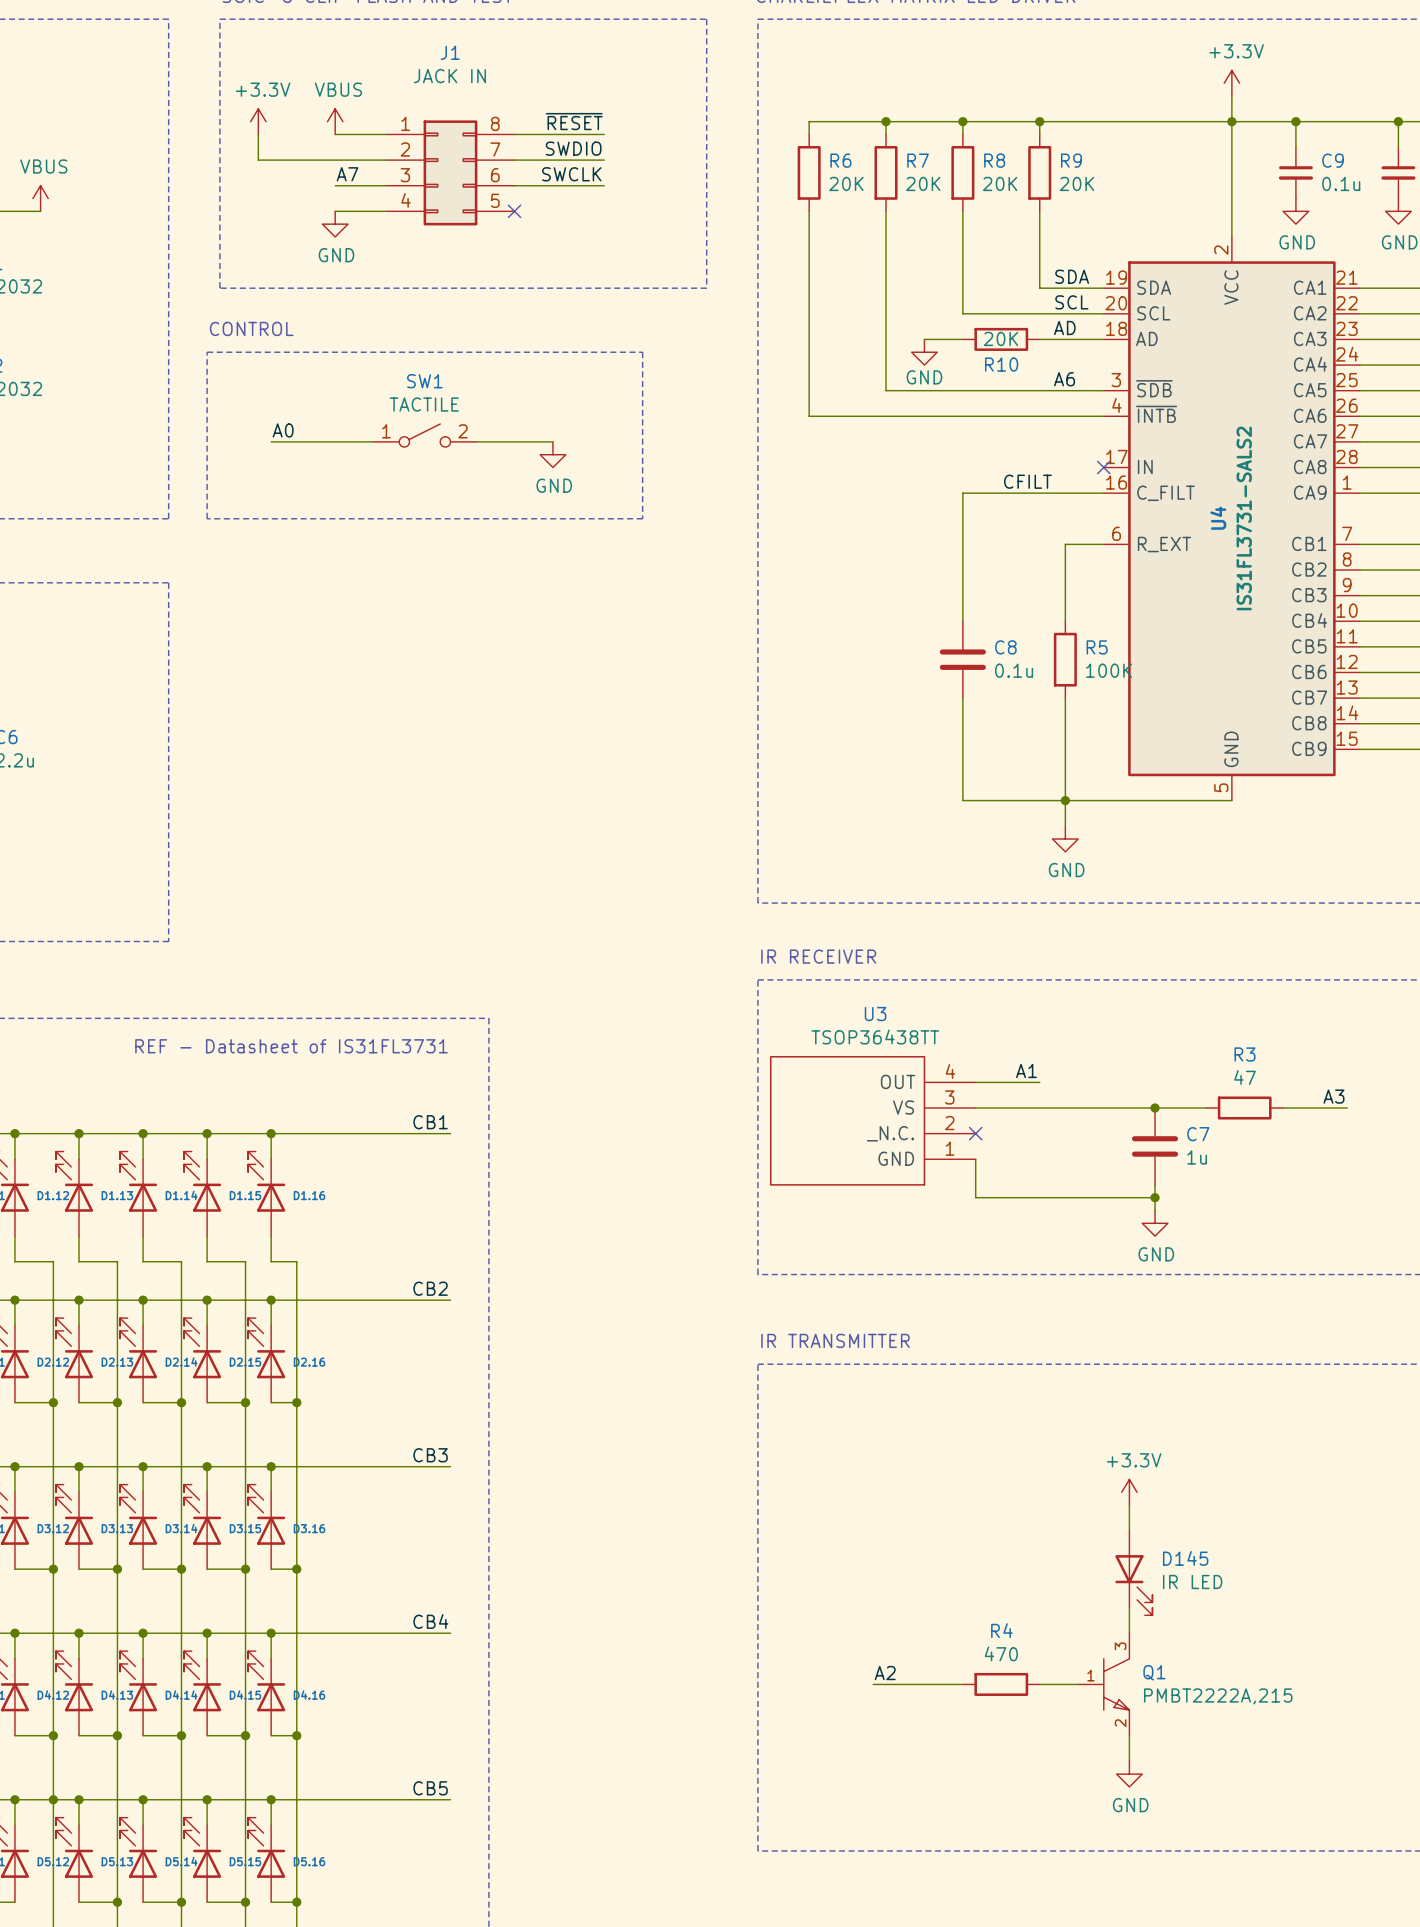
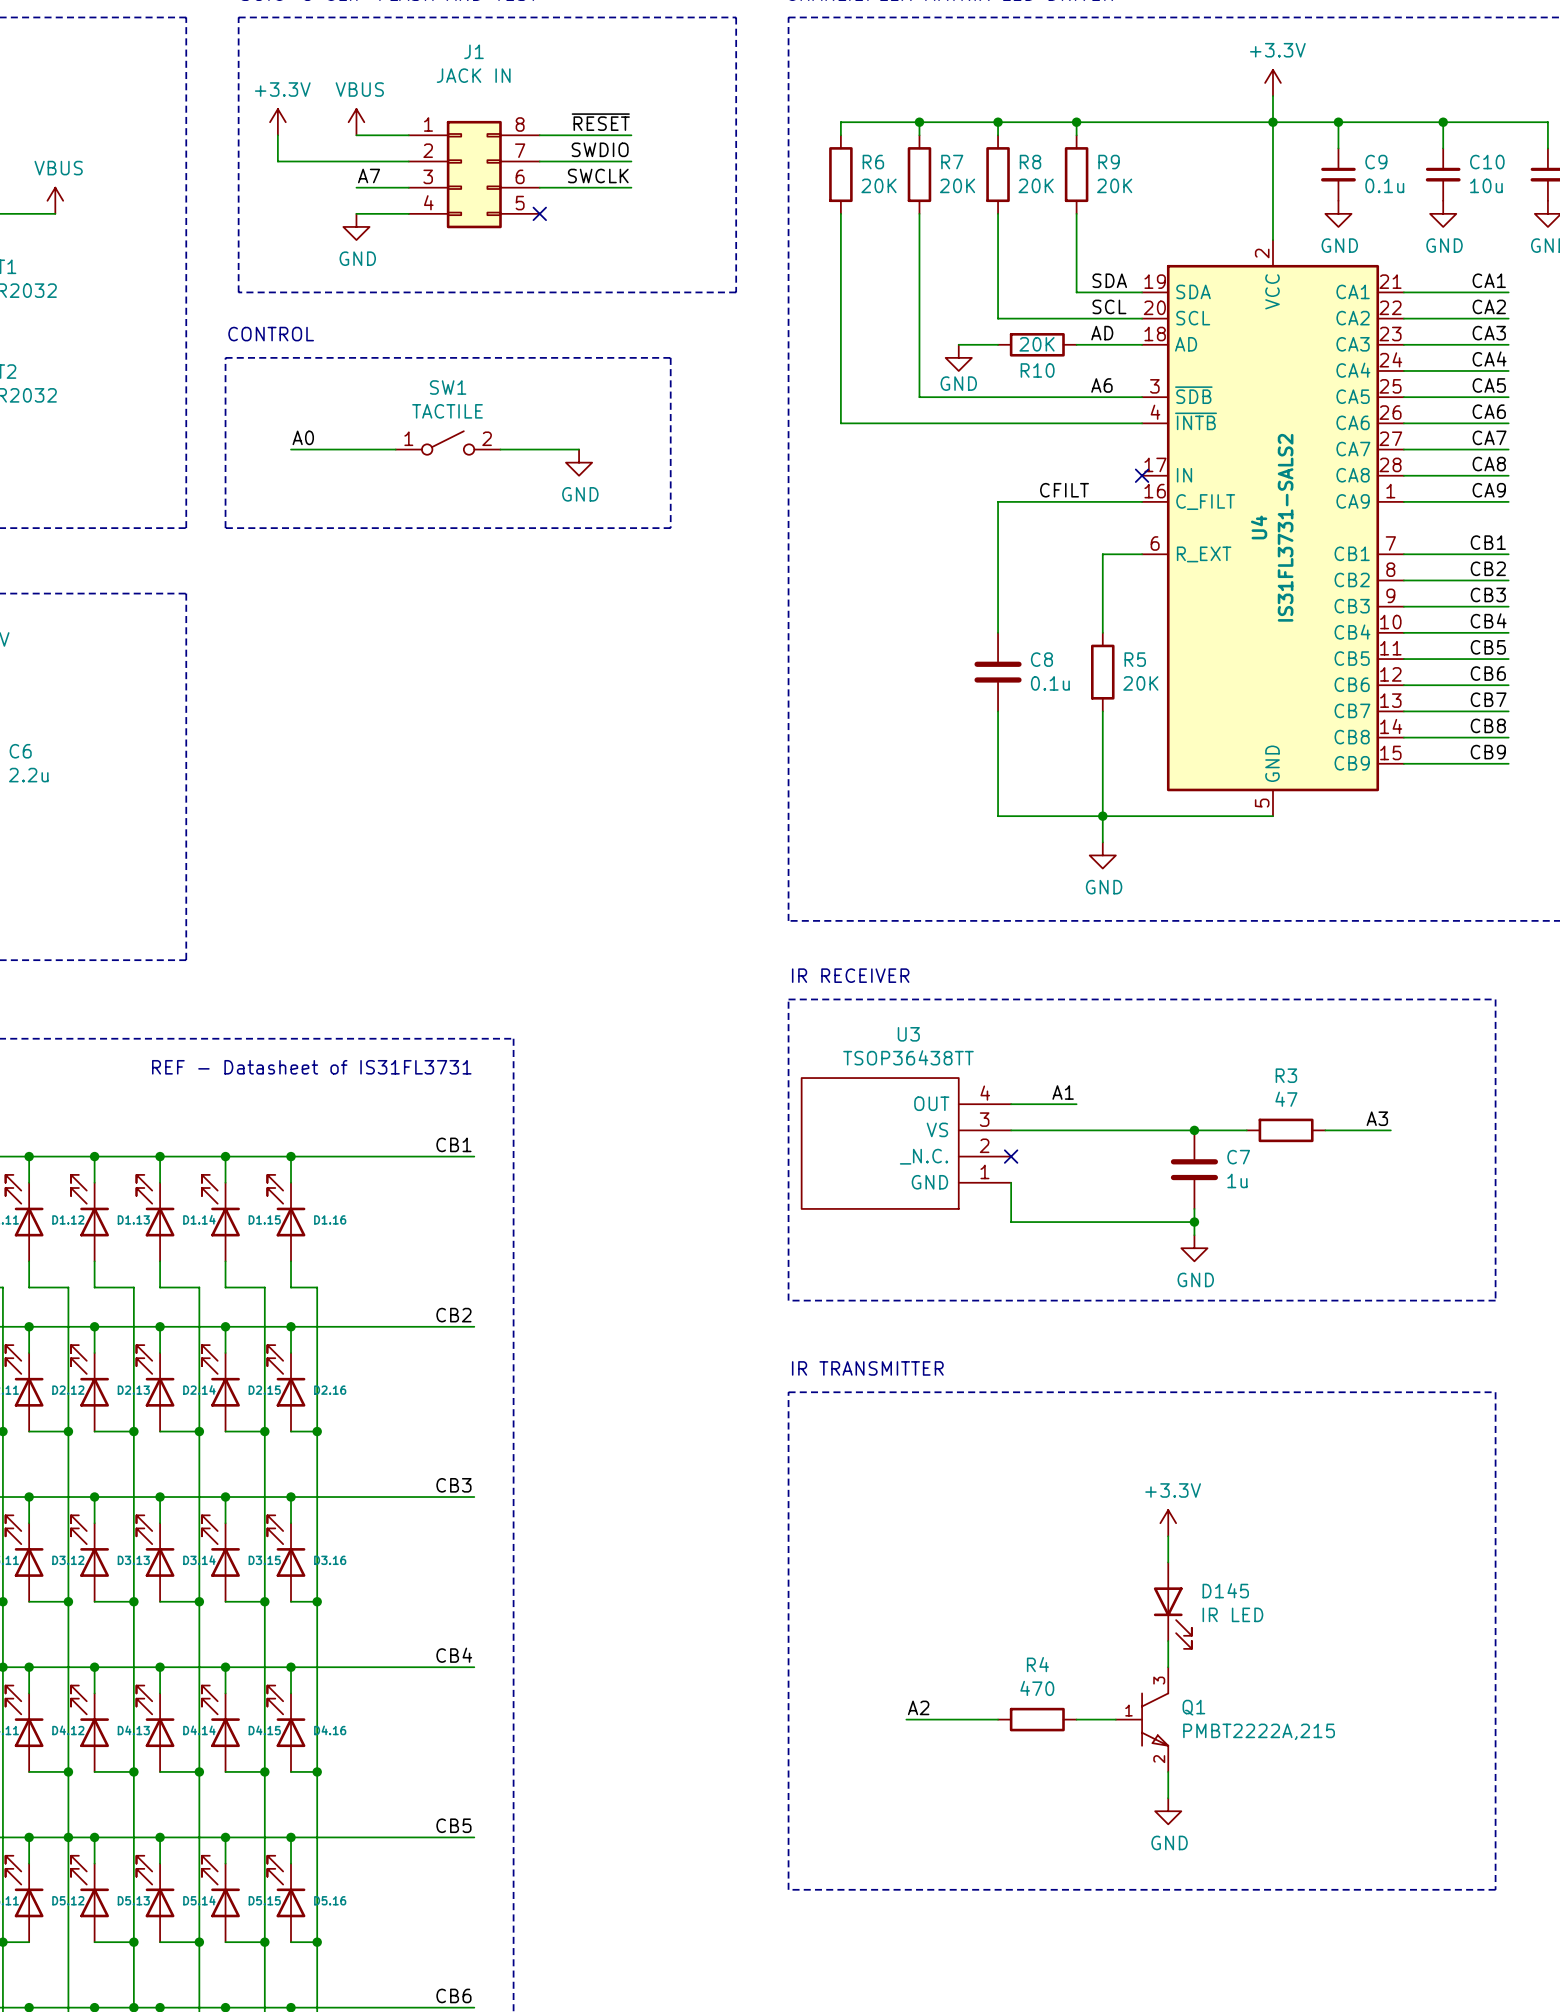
R5 value: 100K (1109, 670) -> 20K (1140, 683)

